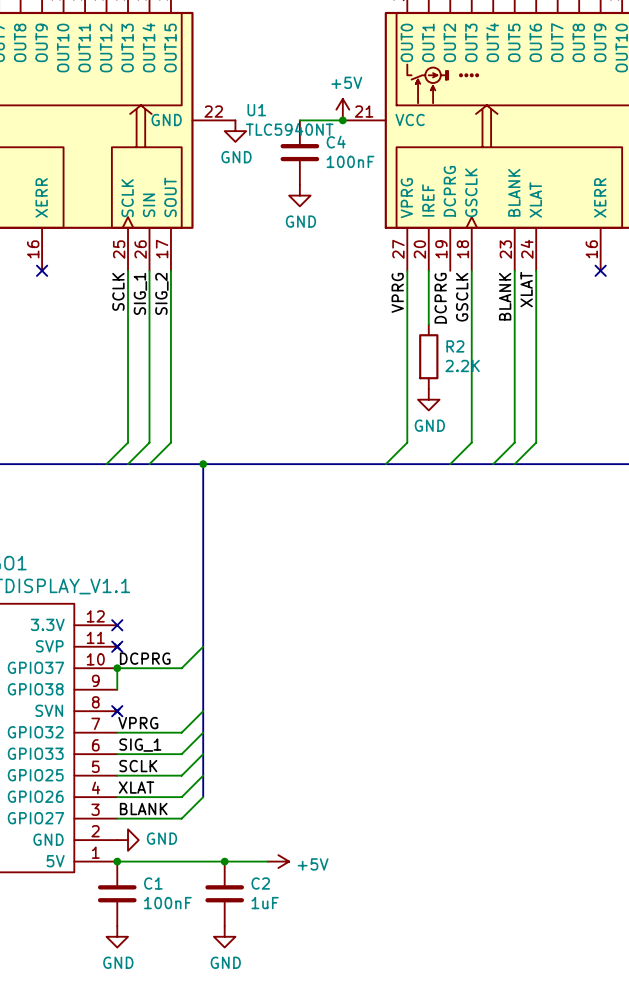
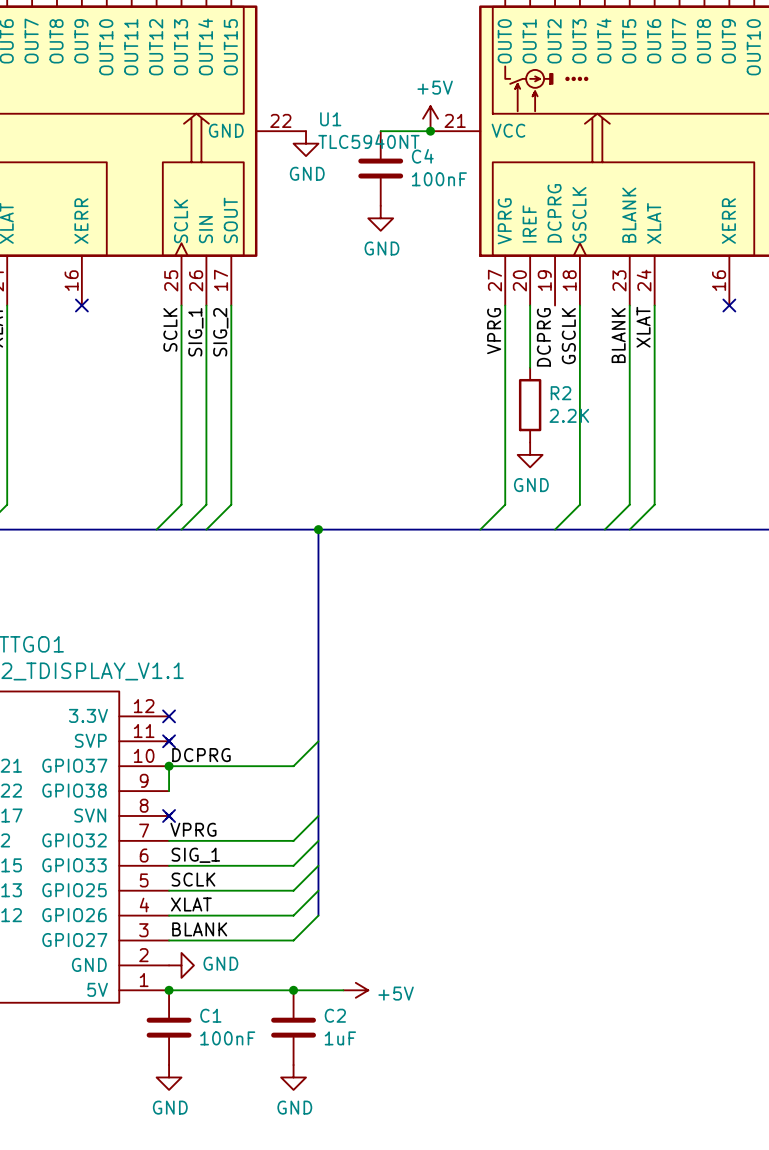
bus: (203, 464) (203, 797) -> (318, 529) (318, 915)
junction position: (203, 464) -> (318, 529)
wire: (203, 646) (181, 668) -> (318, 741) (293, 766) (243, 766)
wire: (203, 711) (181, 732) -> (318, 815) (293, 840) (243, 840)
wire: (203, 732) (181, 754) -> (318, 840) (293, 865) (243, 865)
wire: (203, 754) (181, 775) -> (318, 865) (293, 890) (243, 890)
wire: (203, 775) (181, 797) -> (318, 890) (293, 915) (243, 915)
wire: (203, 797) (181, 818) -> (318, 915) (293, 940) (243, 940)

